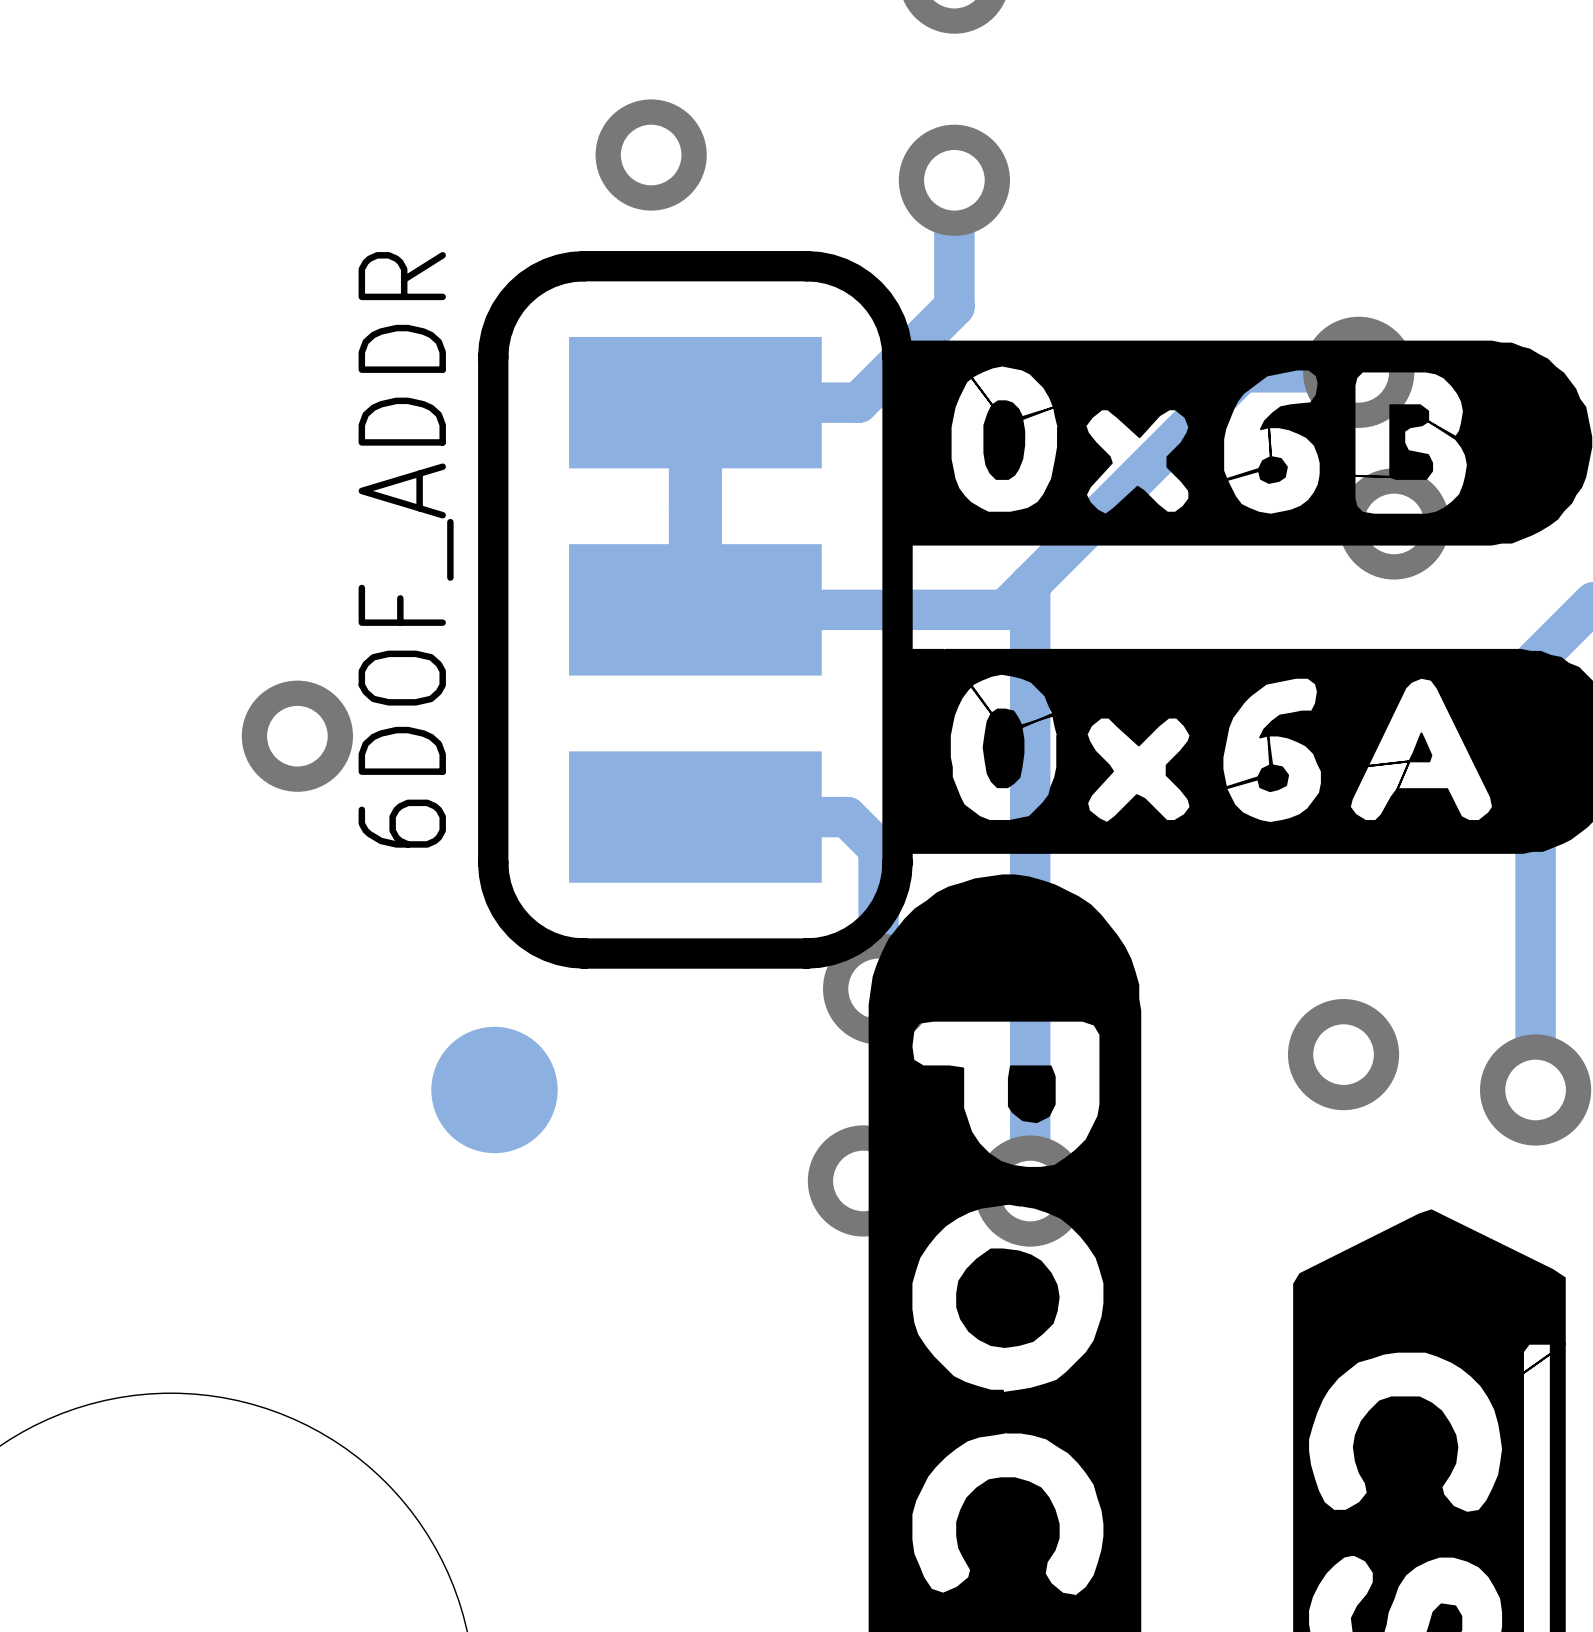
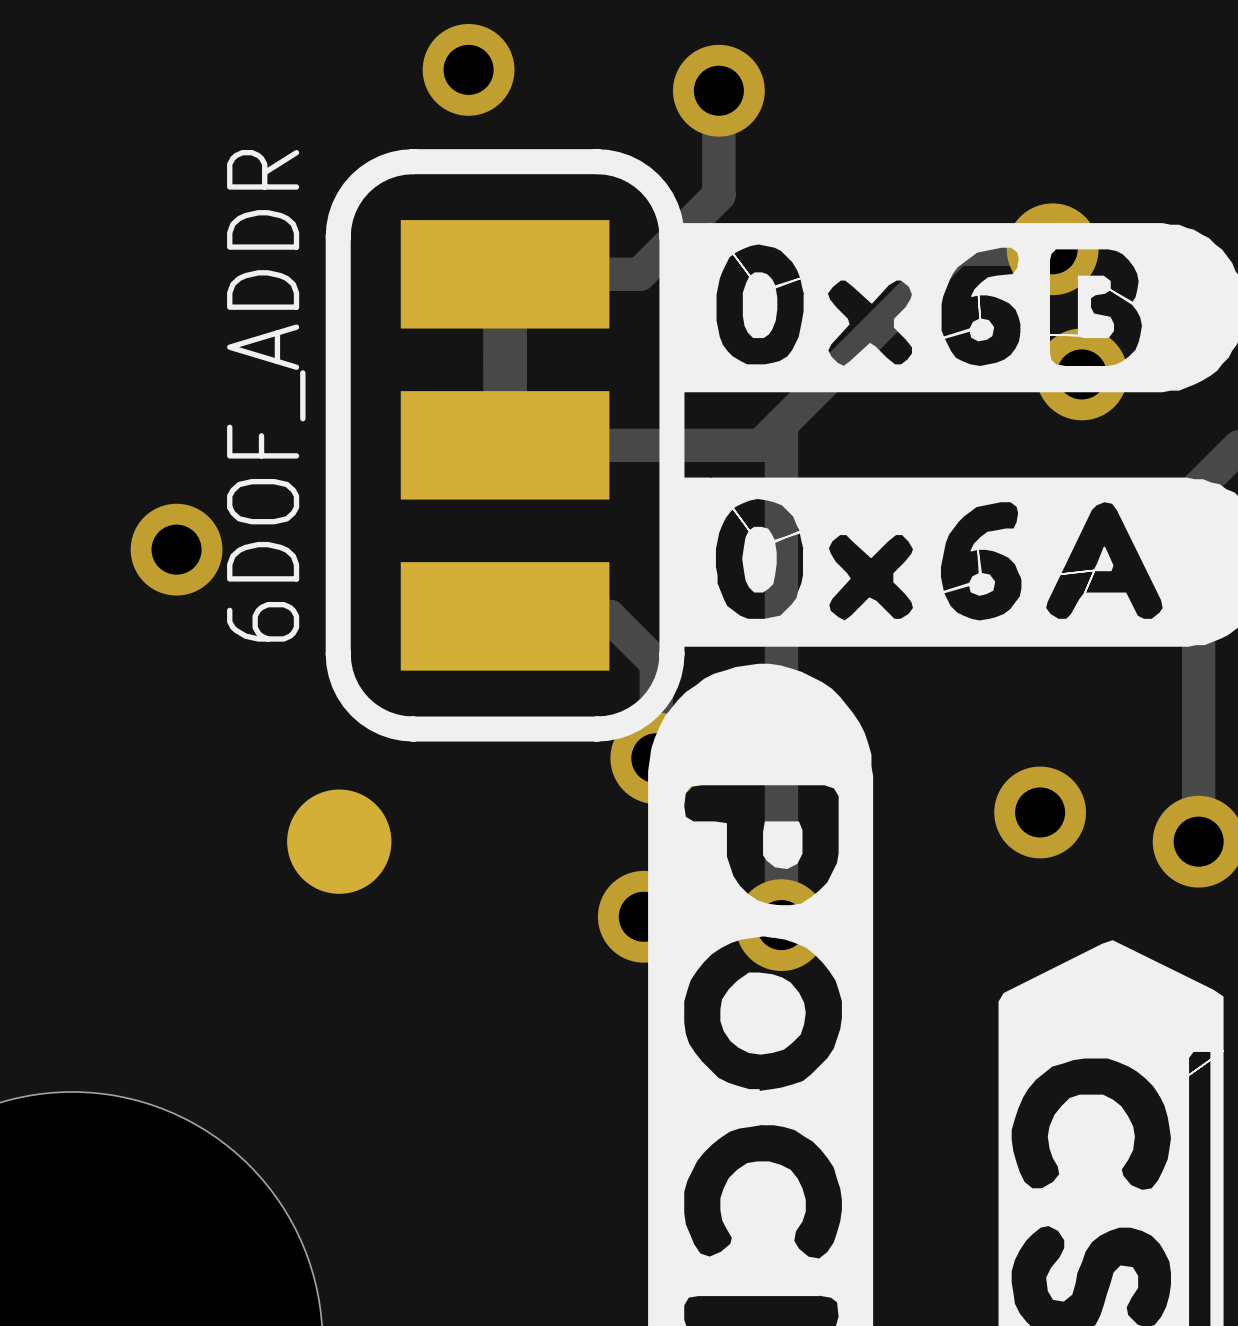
track: (821, 817) (847, 817) (878, 848) (878, 873) -> (609, 616) (656, 663)

